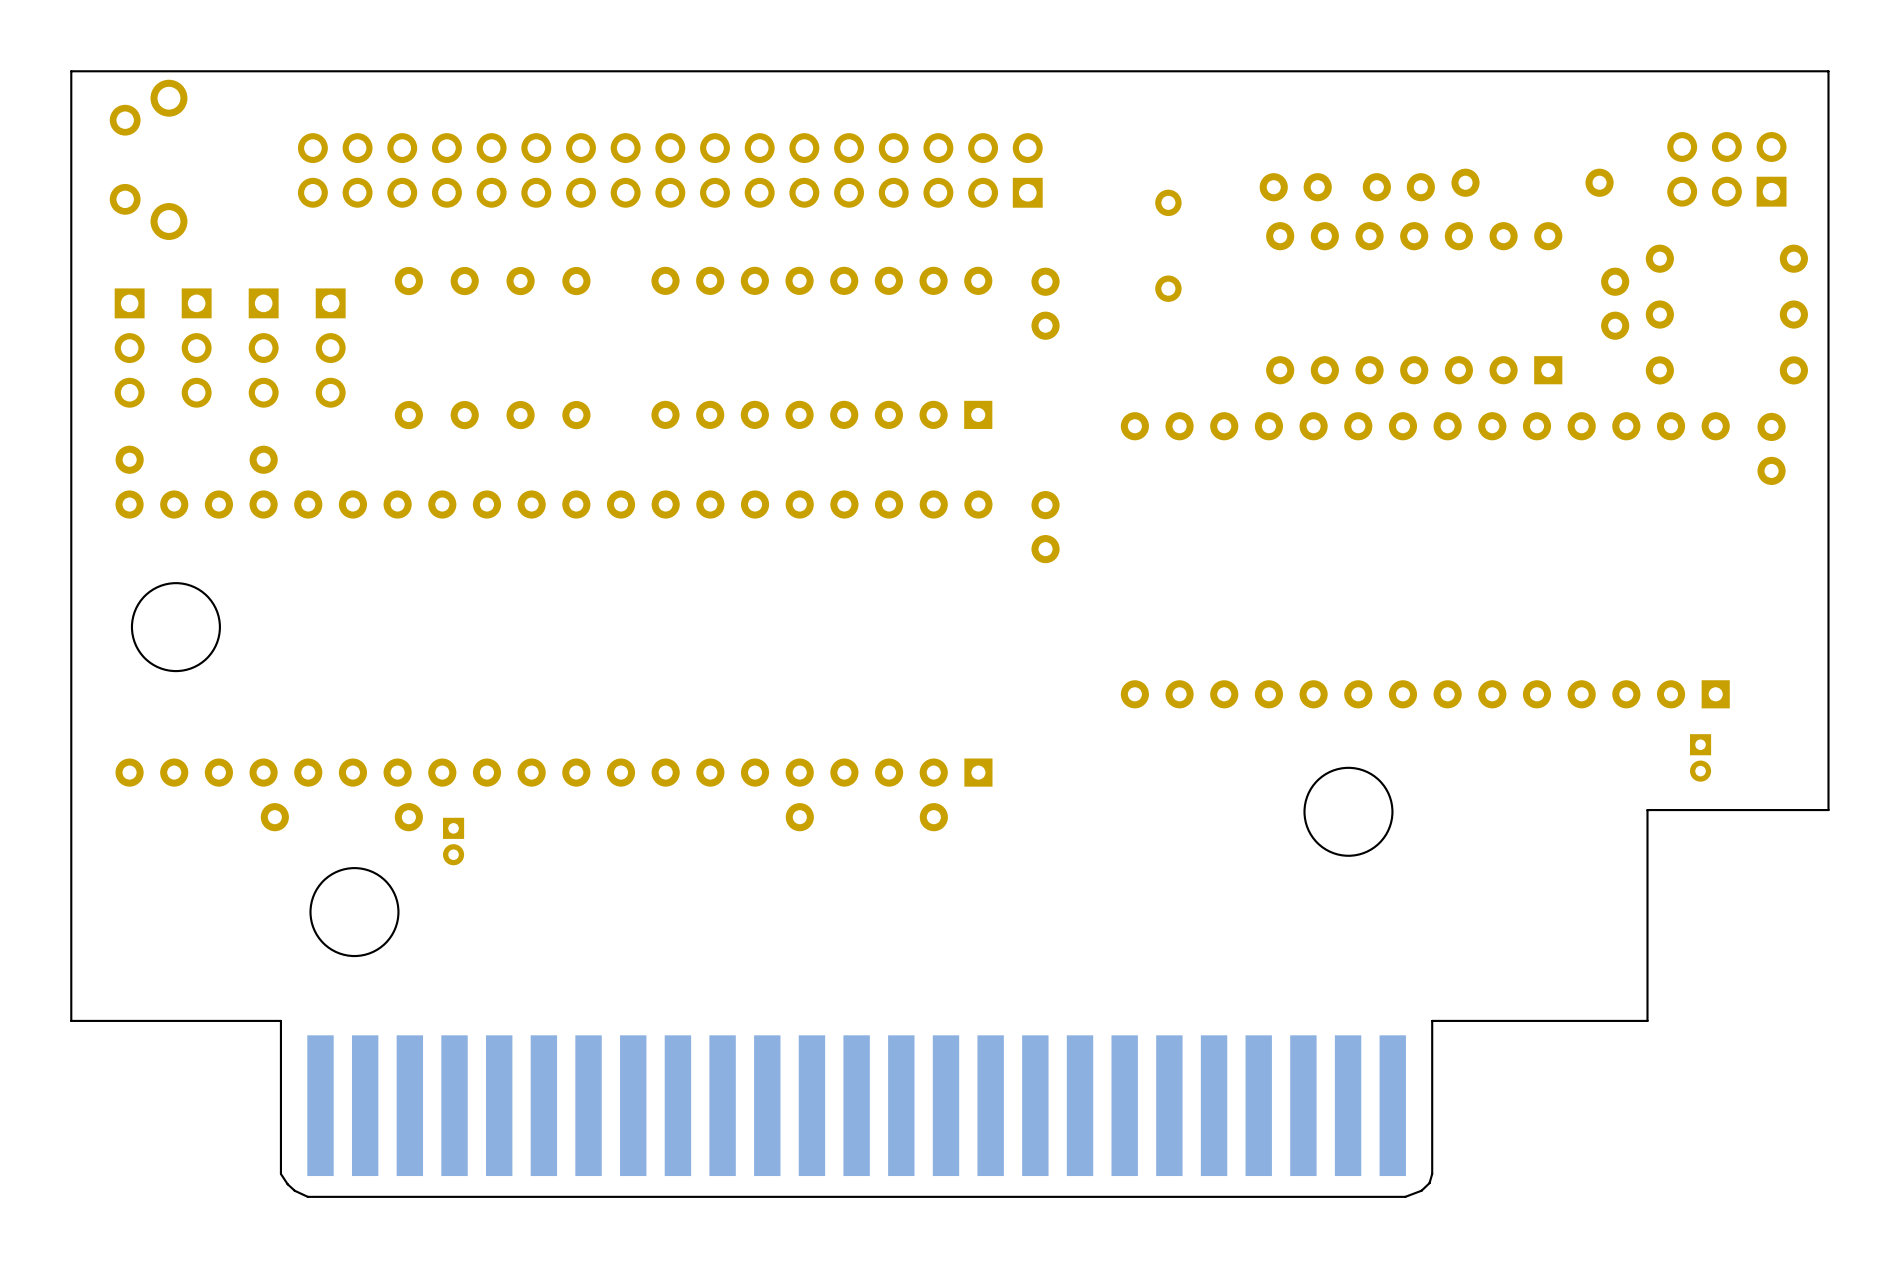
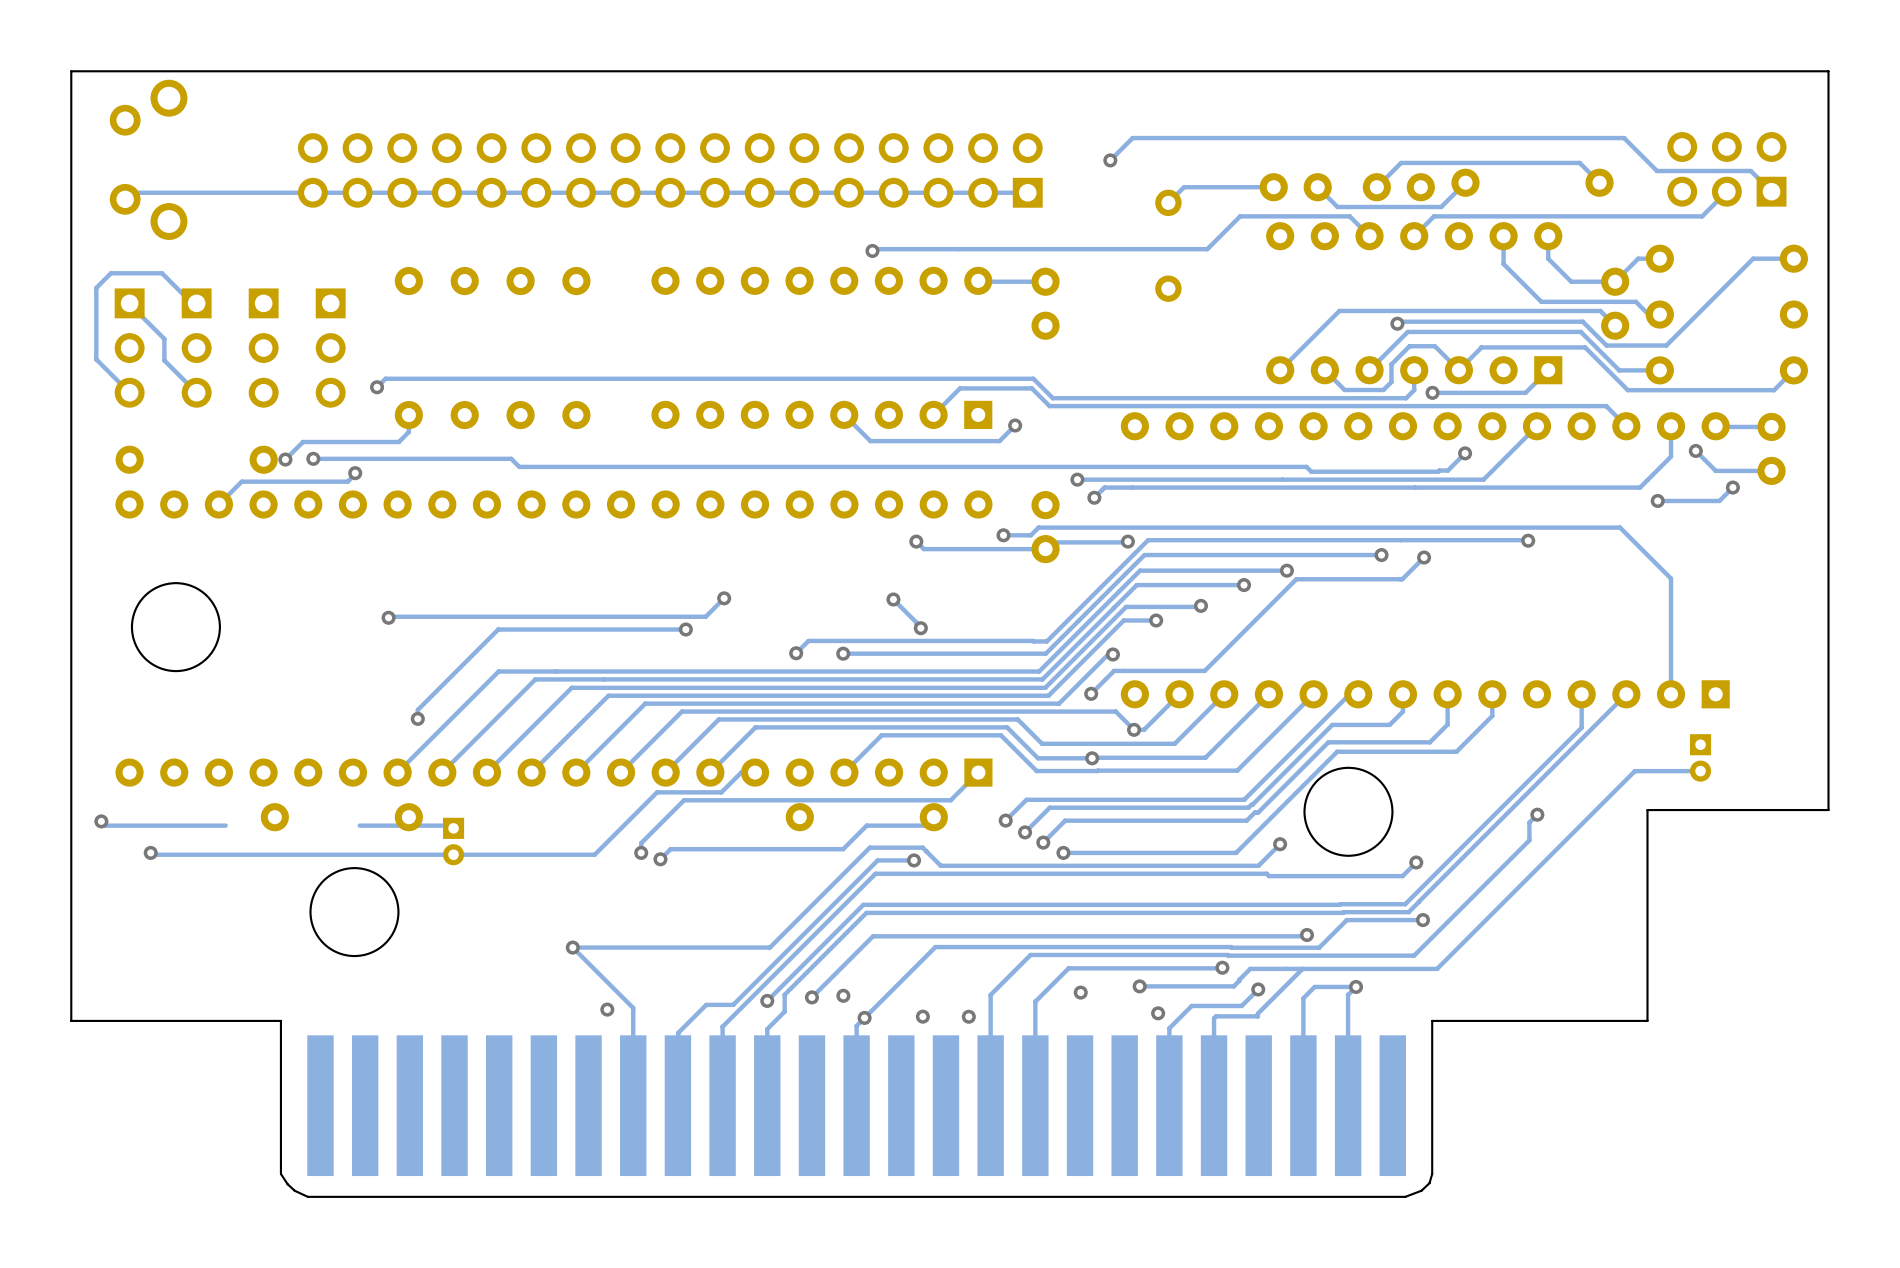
track: none -> (1110, 160) (1132, 138) (1624, 138) (1657, 171) (1750, 171) (1771, 191)
via: none -> (1110, 160)
track: none -> (1465, 182) (1441, 207) (1337, 207) (1317, 187)
track: none -> (1599, 182) (1579, 162) (1401, 162) (1376, 187)
track: none -> (1273, 187) (1184, 187) (1168, 202)
track: none -> (1726, 191) (1702, 216) (1434, 216) (1414, 236)
track: none -> (1027, 192) (131, 192) (125, 199)
track: none -> (1369, 236) (1349, 216) (1240, 216) (1207, 249) (874, 249) (872, 250)
track: none -> (1503, 236) (1503, 264) (1541, 301) (1635, 301) (1648, 314) (1659, 314)
track: none -> (1548, 236) (1548, 258) (1571, 281) (1615, 281) (1638, 258) (1659, 258)
via: none -> (872, 250)
track: none -> (1793, 258) (1753, 258) (1666, 345) (1606, 345) (1582, 321) (1399, 321) (1397, 323)
track: none -> (978, 280) (1045, 281)
track: none -> (129, 303) (164, 339) (164, 360) (196, 392)
track: none -> (196, 303) (192, 303) (162, 273) (110, 273) (96, 287) (96, 359) (129, 392)
via: none -> (1397, 323)
track: none -> (1615, 325) (1600, 310) (1339, 310) (1280, 370)
track: none -> (1324, 370) (1344, 390) (1383, 390) (1391, 382) (1391, 364) (1409, 346) (1434, 346) (1458, 370) (1481, 347) (1585, 347) (1627, 390) (1774, 390) (1793, 370)
track: none -> (1369, 370) (1407, 331) (1580, 331) (1619, 370) (1659, 370)
track: none -> (1414, 370) (1414, 390) (1406, 398) (1052, 398) (1033, 378) (385, 378) (377, 387)
track: none -> (1548, 370) (1525, 392) (1432, 392)
via: none -> (377, 387)
via: none -> (1432, 392)
track: none -> (844, 414) (870, 441) (999, 441) (1015, 425)
track: none -> (933, 414) (960, 388) (1031, 388) (1049, 406) (1606, 406) (1626, 426)
track: none -> (408, 415) (408, 432) (398, 442) (302, 442) (285, 459)
via: none -> (1015, 425)
track: none -> (1536, 426) (1483, 479) (1076, 480)
track: none -> (1671, 426) (1671, 456) (1640, 487) (1104, 487) (1094, 497)
track: none -> (1715, 426) (1771, 426)
track: none -> (1695, 450) (1715, 470) (1771, 470)
via: none -> (1695, 450)
track: none -> (1465, 453) (1447, 470) (1438, 471) (1311, 471) (1306, 466) (519, 466) (511, 458) (313, 458)
via: none -> (1465, 453)
via: none -> (313, 458)
via: none -> (285, 459)
track: none -> (355, 473) (347, 481) (241, 481) (218, 504)
via: none -> (355, 473)
via: none -> (1077, 479)
track: none -> (1732, 487) (1719, 500) (1657, 500)
via: none -> (1732, 487)
via: none -> (1094, 497)
via: none -> (1657, 500)
track: none -> (1003, 535) (1030, 535) (1038, 527) (1620, 527) (1671, 578) (1671, 694)
via: none -> (1003, 535)
track: none -> (1528, 540) (1148, 540) (1046, 641) (808, 640) (796, 653)
via: none -> (1528, 540)
via: none -> (916, 541)
track: none -> (1127, 541) (1052, 542) (1045, 549) (923, 549) (916, 541)
via: none -> (1127, 541)
track: none -> (1381, 555) (1144, 555) (1045, 653) (843, 653)
via: none -> (1381, 555)
track: none -> (1424, 557) (1402, 579) (1296, 579) (1204, 670) (1114, 670) (1091, 693)
via: none -> (1424, 557)
track: none -> (1286, 570) (1140, 570) (1039, 671) (498, 671) (397, 772)
via: none -> (1286, 570)
track: none -> (1244, 585) (1136, 585) (1042, 679) (535, 679) (442, 772)
via: none -> (1244, 585)
track: none -> (724, 598) (705, 616) (388, 617)
via: none -> (724, 598)
track: none -> (893, 599) (920, 628)
via: none -> (893, 599)
track: none -> (1201, 602) (1196, 606) (1126, 606) (1045, 687) (571, 687) (486, 772)
via: none -> (1200, 605)
via: none -> (388, 617)
track: none -> (1156, 620) (1123, 620) (1048, 695) (608, 695) (531, 772)
via: none -> (1156, 620)
via: none -> (920, 628)
track: none -> (685, 629) (498, 629) (417, 709) (417, 718)
via: none -> (685, 629)
via: none -> (796, 653)
via: none -> (843, 653)
track: none -> (1112, 654) (1108, 654) (1059, 703) (645, 703) (576, 772)
via: none -> (1112, 654)
via: none -> (1091, 693)
track: none -> (1179, 694) (1144, 729) (1134, 729) (1115, 711) (682, 711) (621, 772)
track: none -> (1224, 694) (1174, 743) (1042, 743) (1017, 719) (718, 719) (665, 772)
track: none -> (1268, 694) (1205, 757) (1038, 758) (1007, 727) (755, 727) (710, 772)
track: none -> (1313, 694) (1237, 770) (1036, 771) (1000, 735) (881, 735) (844, 772)
track: none -> (1358, 694) (1349, 694) (1244, 799) (1026, 799) (1005, 820)
track: none -> (1402, 694) (1402, 711) (1389, 724) (1332, 724) (1248, 807) (1049, 807) (1025, 832)
track: none -> (1447, 694) (1447, 724) (1429, 742) (1328, 742) (1258, 812) (1254, 812) (1246, 820) (1065, 820) (1043, 842)
track: none -> (1492, 694) (1492, 715) (1456, 751) (1337, 751) (1236, 852) (1063, 852)
track: none -> (1581, 694) (1581, 727) (1405, 904) (863, 904) (767, 1000)
track: none -> (1626, 694) (1419, 901)
via: none -> (417, 718)
via: none -> (1134, 729)
via: none -> (1092, 758)
track: none -> (1700, 771) (1634, 771) (1437, 968) (1250, 968) (1233, 986) (1139, 986)
track: none -> (755, 772) (741, 772) (721, 792) (657, 792) (594, 854) (152, 854) (150, 852)
track: none -> (978, 772) (950, 800) (684, 800) (641, 843) (641, 852)
track: none -> (1537, 814) (1529, 822) (1529, 840) (1414, 955) (1030, 954) (990, 994) (990, 1105)
via: none -> (1537, 814)
via: none -> (1005, 820)
track: none -> (101, 821) (105, 825) (225, 825)
via: none -> (101, 821)
track: none -> (359, 825) (450, 825) (453, 828)
track: none -> (933, 825) (866, 825) (843, 849) (670, 849) (660, 859)
via: none -> (1025, 832)
via: none -> (1043, 842)
track: none -> (1280, 844) (1258, 865) (940, 865) (922, 847) (869, 847) (769, 947) (572, 947) (633, 1008) (633, 1105)
via: none -> (1280, 844)
via: none -> (150, 852)
via: none -> (641, 852)
via: none -> (1063, 852)
via: none -> (660, 859)
track: none -> (914, 860) (877, 860) (733, 1004) (706, 1004) (678, 1032) (677, 1105)
via: none -> (914, 860)
track: none -> (1416, 862) (1402, 876) (1269, 876) (1266, 873) (875, 873) (722, 1026) (722, 1105)
via: none -> (1416, 862)
track: none -> (1419, 901) (1408, 912) (866, 912) (784, 994) (784, 1011) (767, 1029) (767, 1105)
track: none -> (1422, 920) (1346, 920) (1319, 947) (935, 947) (856, 1025) (856, 1105)
via: none -> (1422, 920)
track: none -> (1306, 935) (873, 936) (811, 997)
via: none -> (1306, 935)
via: none -> (572, 947)
track: none -> (1222, 967) (1068, 968) (1035, 1001) (1035, 1105)
via: none -> (1222, 967)
track: none -> (1302, 968) (1257, 1013) (1257, 1016) (1216, 1016) (1214, 1018) (1214, 1105)
via: none -> (1139, 986)
via: none -> (1356, 986)
track: none -> (1258, 989) (1241, 1005) (1191, 1005) (1169, 1028) (1169, 1105)
via: none -> (1258, 989)
via: none -> (1080, 992)
via: none -> (843, 995)
via: none -> (811, 997)
via: none -> (767, 1000)
via: none -> (607, 1009)
via: none -> (1158, 1013)
via: none -> (922, 1016)
via: none -> (968, 1016)
via: none -> (864, 1017)
track: none -> (1348, 1105) (1348, 994) (1356, 986) (1314, 986) (1303, 998) (1303, 1105)

